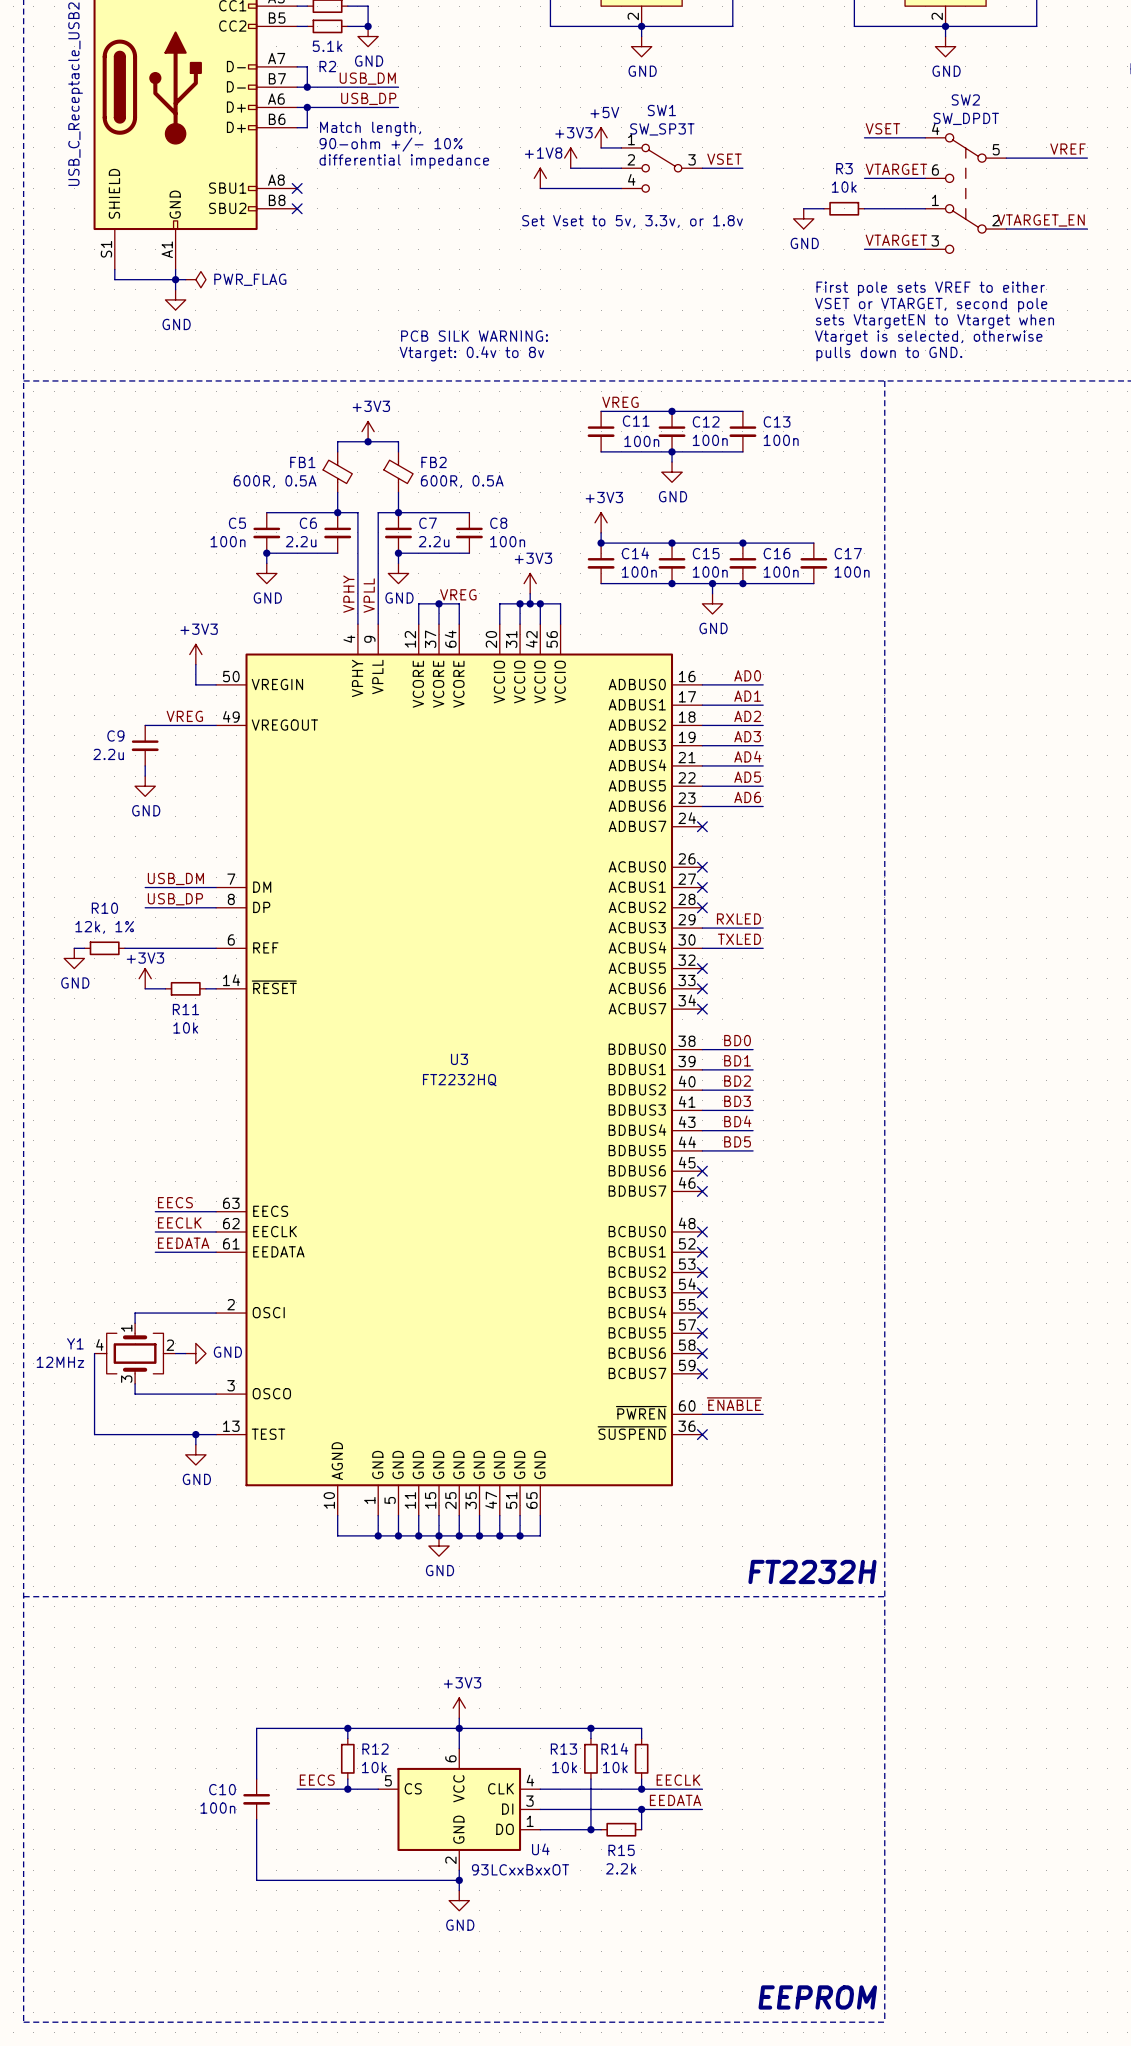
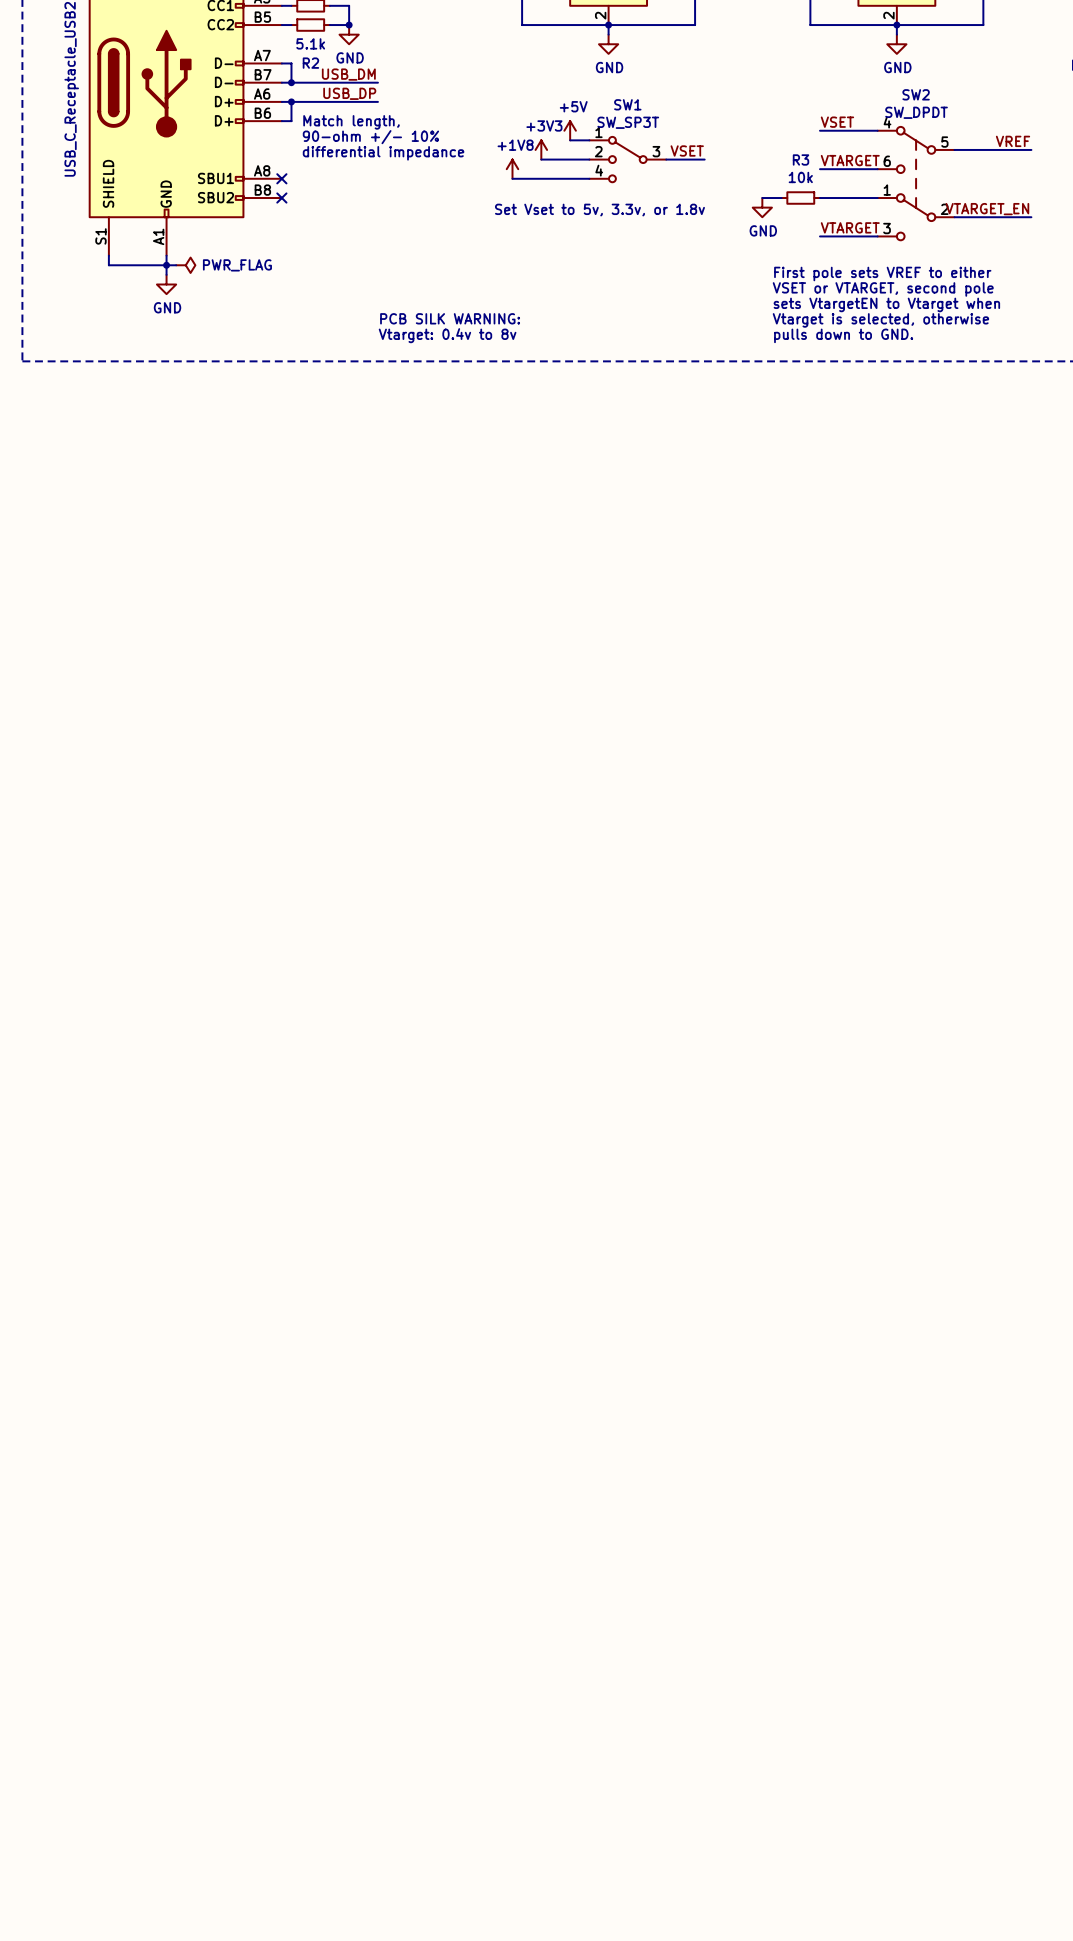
line: (23, 380) (23, 2022) (884, 2022) (884, 380) -> none
label: VREG (620, 402) -> none
wire: (601, 411) (742, 411) -> none
junction: (672, 411) -> none
power symbol: +3V3 (368, 431) -> none
C11: 100n (601, 431) -> none
C12: 100n (672, 431) -> none
C13: 100n (742, 431) -> none
junction: (368, 441) -> none
wire: (337, 451) (337, 441) (398, 441) (398, 451) -> none
wire: (601, 451) (742, 451) -> none
wire: (672, 451) (672, 462) -> none
junction: (672, 451) -> none
FB1: 600R, 0.5A (337, 472) -> none
FB2: 600R, 0.5A (398, 472) -> none
power symbol: GND (672, 472) -> none
wire: (337, 492) (337, 512) -> none
wire: (398, 492) (398, 512) -> none
wire: (266, 512) (357, 512) (357, 624) -> none
junction: (337, 512) -> none
junction: (398, 512) -> none
wire: (469, 512) (378, 512) (378, 624) -> none
power symbol: +3V3 (601, 522) -> none
C5: 100n (266, 532) -> none
C6: 2.2u (337, 532) -> none
C7: 2.2u (398, 532) -> none
C8: 100n (469, 532) -> none
wire: (601, 532) (601, 543) (813, 543) -> none
junction: (601, 543) -> none
junction: (672, 543) -> none
junction: (742, 543) -> none
junction: (266, 553) -> none
wire: (337, 553) (266, 553) (266, 563) -> none
junction: (398, 553) -> none
wire: (469, 553) (398, 553) (398, 563) -> none
C14: 100n (601, 563) -> none
C15: 100n (672, 563) -> none
C16: 100n (742, 563) -> none
C17: 100n (813, 563) -> none
power symbol: GND (266, 573) -> none
power symbol: GND (398, 573) -> none
power symbol: +3V3 (530, 583) -> none
wire: (601, 583) (813, 583) -> none
junction: (672, 583) -> none
wire: (712, 583) (712, 593) -> none
junction: (712, 583) -> none
junction: (742, 583) -> none
wire: (530, 593) (530, 603) -> none
label: VPHY (348, 594) -> none
label: VREG (458, 594) -> none
label: VPLL (369, 595) -> none
wire: (439, 603) (439, 624) -> none
junction: (439, 603) -> none
wire: (520, 603) (520, 624) -> none
junction: (520, 603) -> none
junction: (530, 603) -> none
wire: (540, 603) (540, 624) -> none
junction: (540, 603) -> none
power symbol: GND (712, 603) -> none
wire: (418, 624) (418, 603) (459, 603) (459, 624) -> none
wire: (499, 624) (499, 603) (560, 603) (560, 624) -> none
power symbol: +3V3 (195, 654) -> none
wire: (195, 664) (195, 684) (216, 684) -> none
label: AD0 (747, 675) -> none
wire: (702, 684) (763, 684) -> none
label: AD1 (747, 696) -> none
wire: (702, 705) (763, 705) -> none
label: VREG (184, 716) -> none
label: AD2 (747, 716) -> none
wire: (145, 725) (216, 725) -> none
wire: (702, 725) (763, 725) -> none
label: AD3 (747, 736) -> none
C9: 2.2u (145, 745) -> none
wire: (702, 745) (763, 745) -> none
label: AD4 (747, 756) -> none
wire: (145, 765) (145, 776) -> none
wire: (702, 765) (763, 765) -> none
label: AD5 (747, 777) -> none
power symbol: GND (145, 786) -> none
wire: (702, 786) (763, 786) -> none
label: AD6 (747, 797) -> none
wire: (702, 806) (763, 806) -> none
no-connect mark: (702, 826) -> none
no-connect mark: (702, 867) -> none
label: USB_DM (175, 878) -> none
wire: (145, 887) (216, 887) -> none
no-connect mark: (702, 887) -> none
label: USB_DP (175, 899) -> none
wire: (145, 907) (216, 907) -> none
no-connect mark: (702, 907) -> none
label: RXLED (738, 919) -> none
wire: (702, 928) (763, 928) -> none
label: TXLED (739, 939) -> none
wire: (74, 948) (84, 948) -> none
R10: 12k, 1% (104, 948) -> none
wire: (124, 948) (216, 948) -> none
wire: (702, 948) (763, 948) -> none
power symbol: GND (74, 958) -> none
no-connect mark: (702, 968) -> none
power symbol: +3V3 (145, 978) -> none
wire: (145, 988) (165, 988) -> none
R11: 10k (185, 988) -> none
wire: (205, 988) (216, 988) -> none
no-connect mark: (702, 988) -> none
no-connect mark: (702, 1009) -> none
label: BD0 (737, 1040) -> none
wire: (702, 1049) (753, 1049) -> none
label: BD1 (737, 1060) -> none
U3: FT2232HQ (459, 1069) -> none
wire: (702, 1069) (753, 1069) -> none
label: BD2 (737, 1081) -> none
wire: (702, 1090) (753, 1090) -> none
label: BD3 (737, 1101) -> none
wire: (702, 1110) (753, 1110) -> none
label: BD4 (737, 1121) -> none
wire: (702, 1130) (753, 1130) -> none
label: BD5 (737, 1141) -> none
wire: (702, 1150) (753, 1150) -> none
no-connect mark: (702, 1171) -> none
no-connect mark: (702, 1191) -> none
label: EECS (175, 1202) -> none
wire: (155, 1211) (216, 1211) -> none
label: EECLK (179, 1222) -> none
wire: (155, 1231) (216, 1231) -> none
no-connect mark: (702, 1231) -> none
label: EEDATA (183, 1243) -> none
wire: (155, 1252) (216, 1252) -> none
no-connect mark: (702, 1252) -> none
no-connect mark: (702, 1272) -> none
no-connect mark: (702, 1292) -> none
wire: (216, 1313) (135, 1313) (135, 1323) -> none
no-connect mark: (702, 1313) -> none
no-connect mark: (702, 1333) -> none
wire: (94, 1353) (94, 1434) (216, 1434) -> none
Y1: 12MHz (135, 1353) -> none
wire: (175, 1353) (185, 1353) -> none
power symbol: GND (195, 1353) -> none
no-connect mark: (702, 1353) -> none
no-connect mark: (702, 1373) -> none
wire: (135, 1383) (135, 1394) (216, 1394) -> none
label: ~{ENABLE} (734, 1404) -> none
wire: (702, 1414) (763, 1414) -> none
wire: (195, 1434) (195, 1444) -> none
junction: (195, 1434) -> none
no-connect mark: (702, 1434) -> none
power symbol: GND (195, 1454) -> none
wire: (337, 1515) (337, 1535) (540, 1535) (540, 1515) -> none
wire: (378, 1515) (378, 1535) -> none
wire: (398, 1515) (398, 1535) -> none
wire: (418, 1515) (418, 1535) -> none
wire: (439, 1515) (439, 1535) -> none
wire: (459, 1515) (459, 1535) -> none
wire: (479, 1515) (479, 1535) -> none
wire: (499, 1515) (499, 1535) -> none
wire: (520, 1515) (520, 1535) -> none
junction: (378, 1535) -> none
junction: (398, 1535) -> none
junction: (418, 1535) -> none
junction: (439, 1535) -> none
junction: (459, 1535) -> none
junction: (479, 1535) -> none
junction: (499, 1535) -> none
junction: (520, 1535) -> none
power symbol: GND (439, 1546) -> none
text: FT2232H (812, 1571) -> none
line: (23, 1596) (884, 1596) -> none
power symbol: +3V3 (459, 1708) -> none
wire: (459, 1718) (459, 1748) -> none
wire: (347, 1728) (347, 1738) -> none
junction: (347, 1728) -> none
junction: (459, 1728) -> none
wire: (590, 1728) (590, 1738) -> none
junction: (590, 1728) -> none
wire: (641, 1738) (641, 1728) (256, 1728) (256, 1779) -> none
R12: 10k (347, 1758) -> none
R13: 10k (590, 1758) -> none
R14: 10k (641, 1758) -> none
wire: (347, 1779) (347, 1789) -> none
wire: (590, 1779) (590, 1829) -> none
wire: (641, 1779) (641, 1789) -> none
label: EECS (317, 1780) -> none
label: EECLK (678, 1780) -> none
wire: (297, 1789) (378, 1789) -> none
junction: (347, 1789) -> none
wire: (540, 1789) (702, 1789) -> none
junction: (641, 1789) -> none
C10: 100n (256, 1799) -> none
label: EEDATA (675, 1800) -> none
U4: 93LCxxBxxOT (459, 1809) -> none
wire: (540, 1809) (702, 1809) -> none
wire: (641, 1809) (641, 1829) -> none
junction: (641, 1809) -> none
wire: (256, 1819) (256, 1880) (459, 1880) -> none
wire: (540, 1829) (601, 1829) -> none
junction: (590, 1829) -> none
R15: 2.2k (621, 1829) -> none
wire: (459, 1870) (459, 1890) -> none
junction: (459, 1880) -> none
power symbol: GND (459, 1900) -> none
text: EEPROM (817, 1997) -> none

